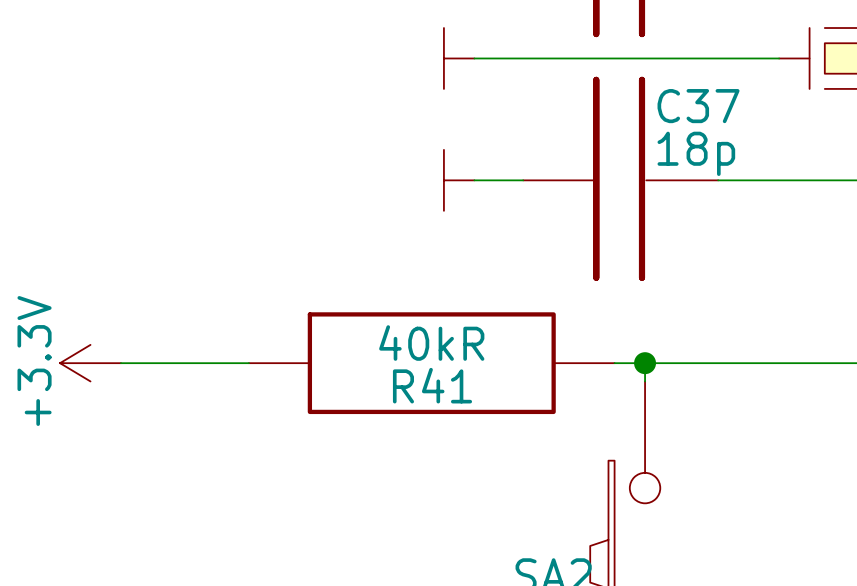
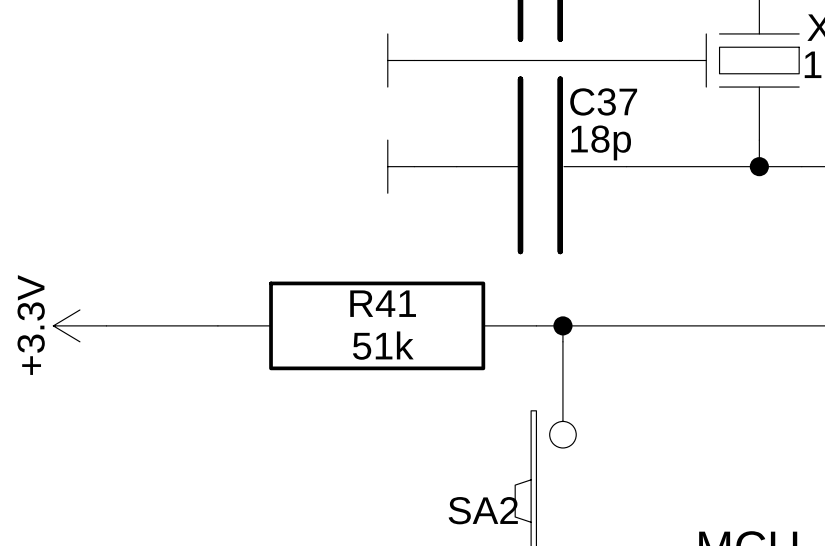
R41 value: 40kR (431, 343) -> 51k (383, 345)
R41 name position: R41 (432, 385) -> R41 (383, 303)

